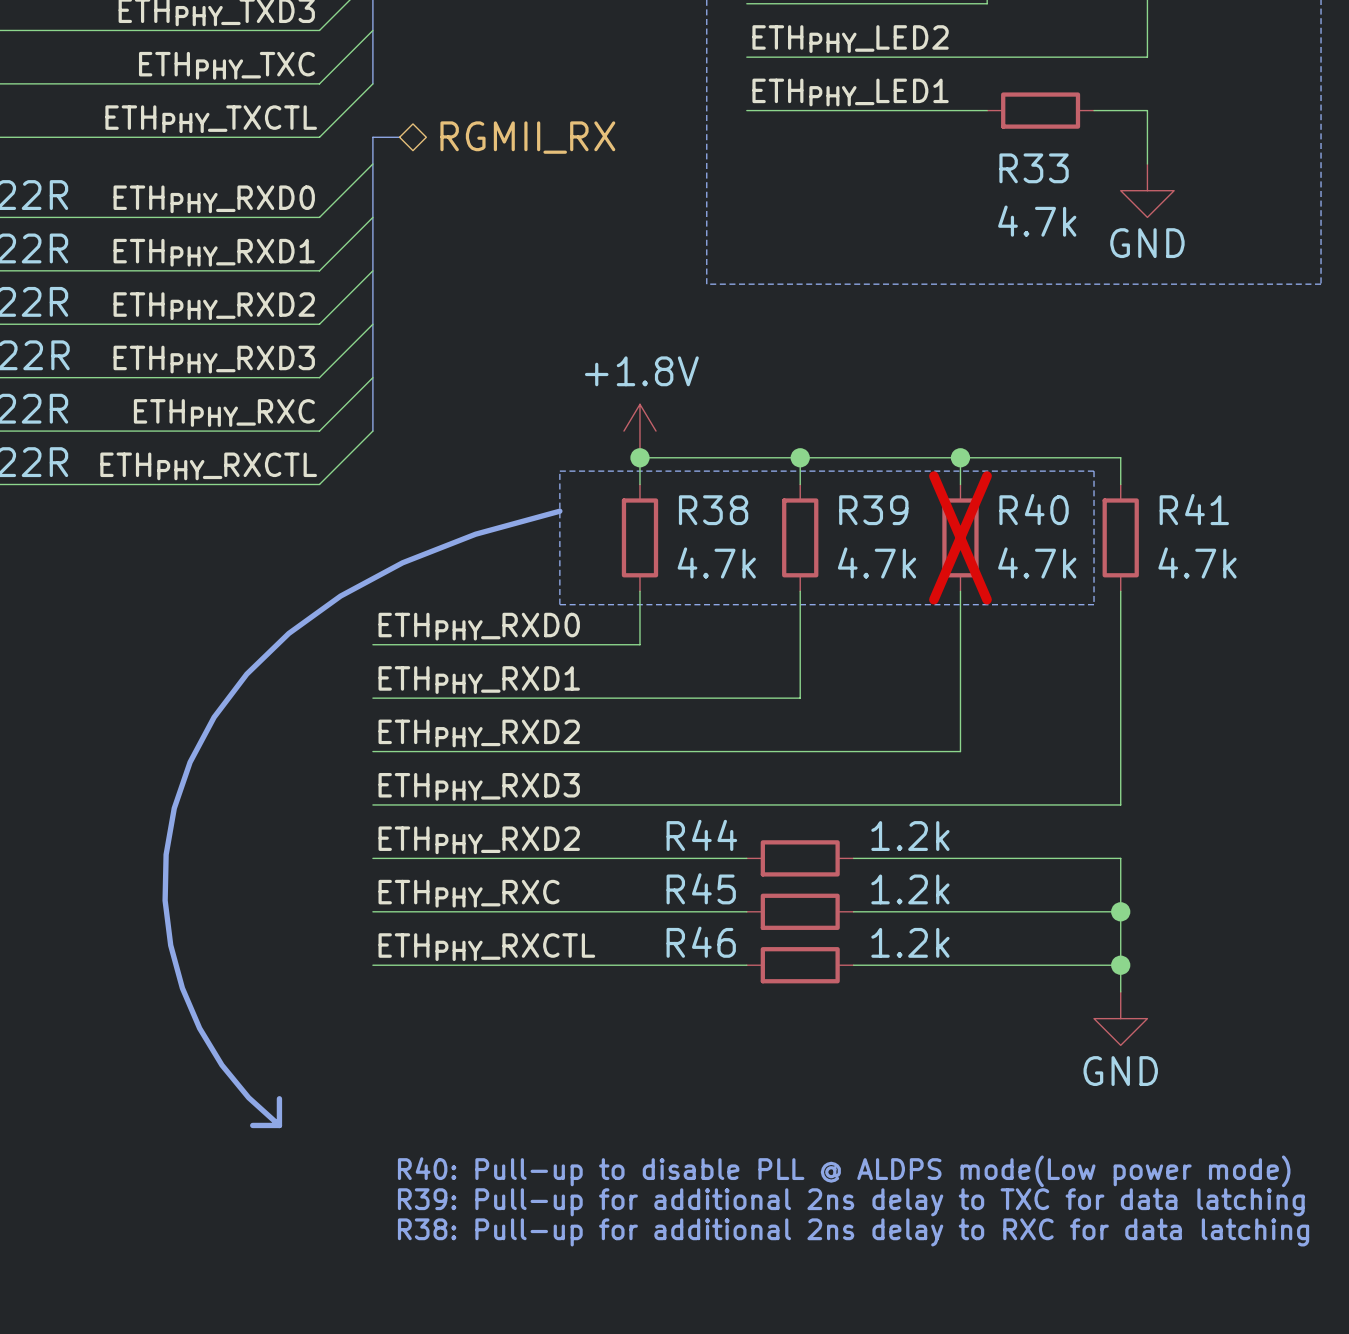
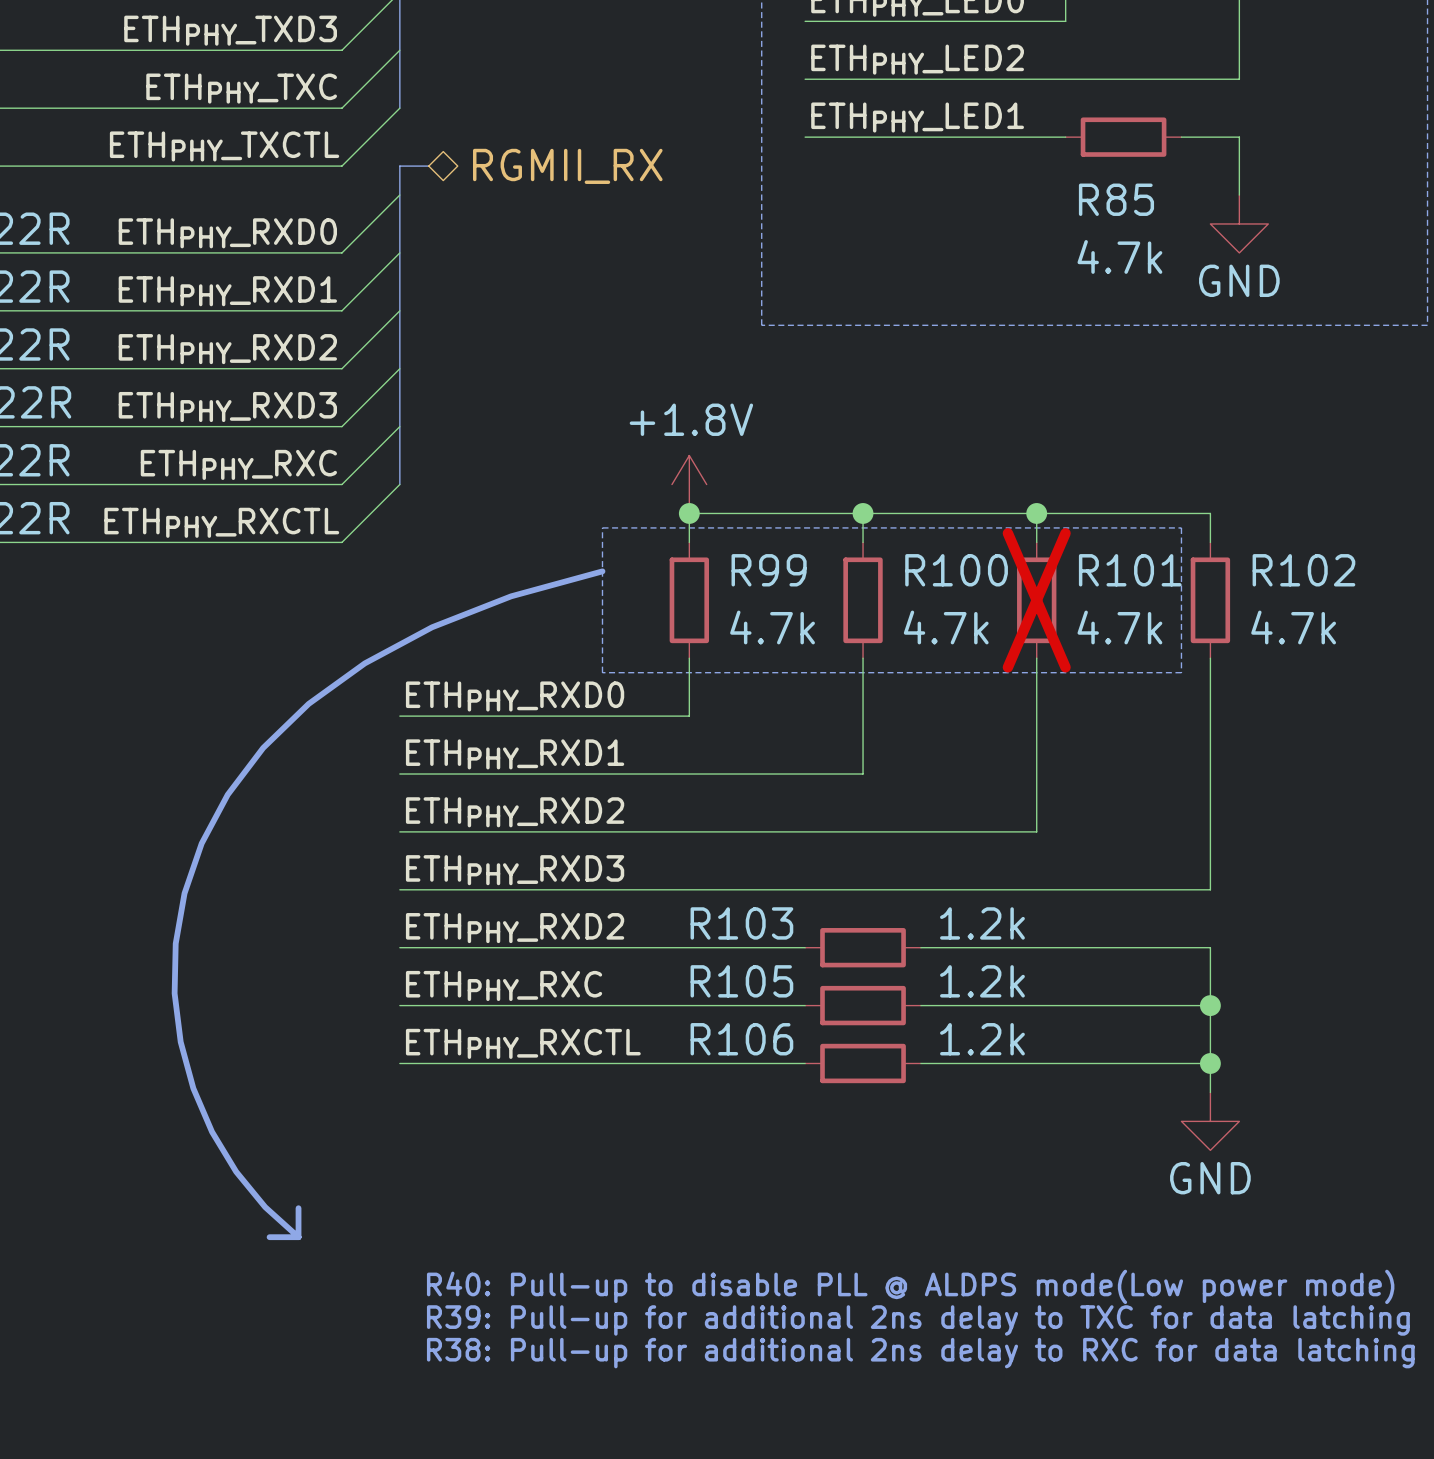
R33 name: R33 (1034, 168) -> R85 (1116, 199)
R40 name: R40 (1034, 509) -> R101 (1130, 570)
R41 name: R41 (1194, 509) -> R102 (1303, 570)
R38 name: R38 (713, 510) -> R99 (769, 570)
R39 name: R39 (873, 510) -> R100 (956, 570)
R44 name: R44 (701, 835) -> R103 (741, 923)
R45 name: R45 (701, 888) -> R105 (741, 981)
R46 name: R46 (701, 942) -> R106 (741, 1039)

